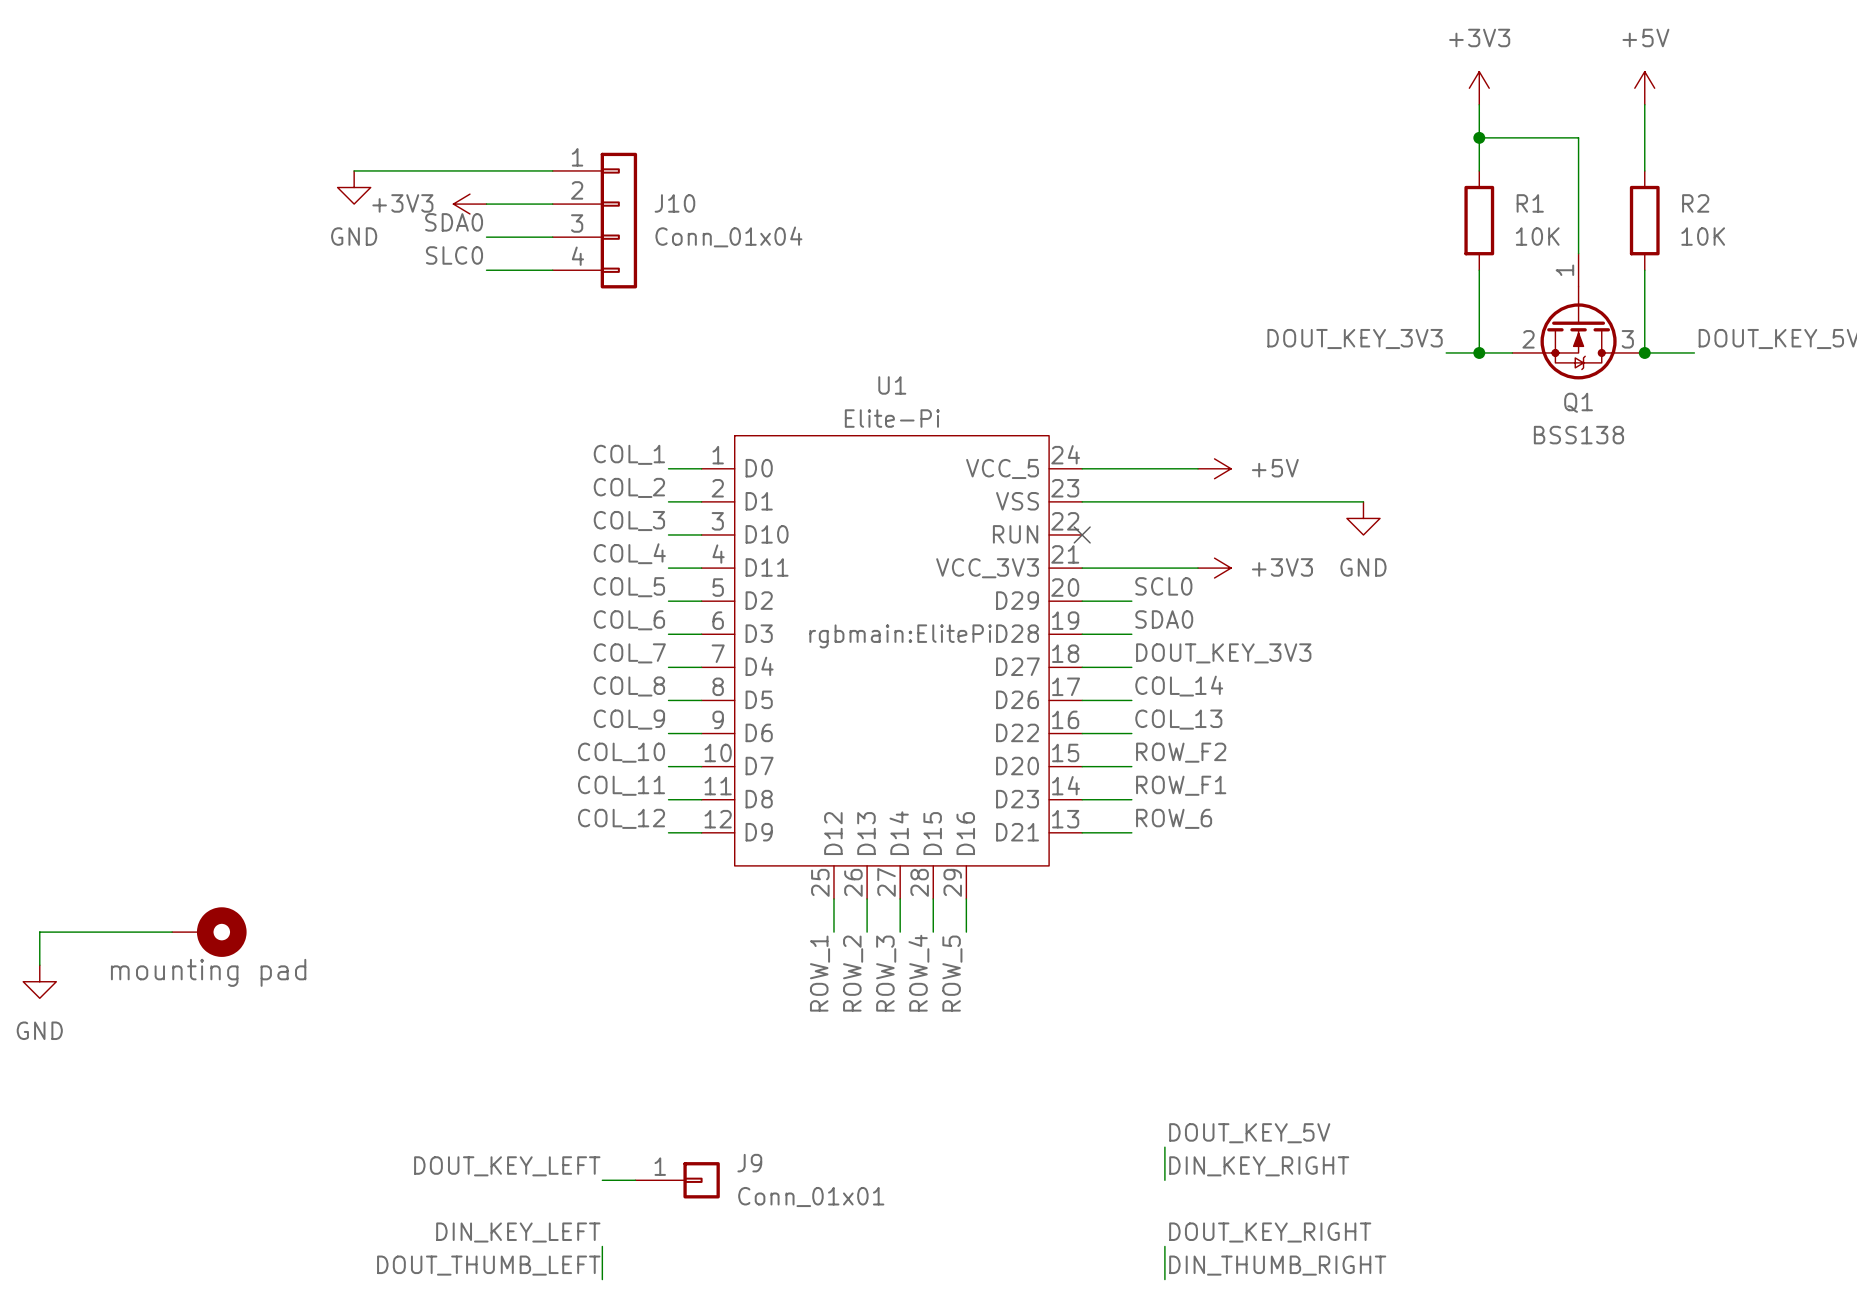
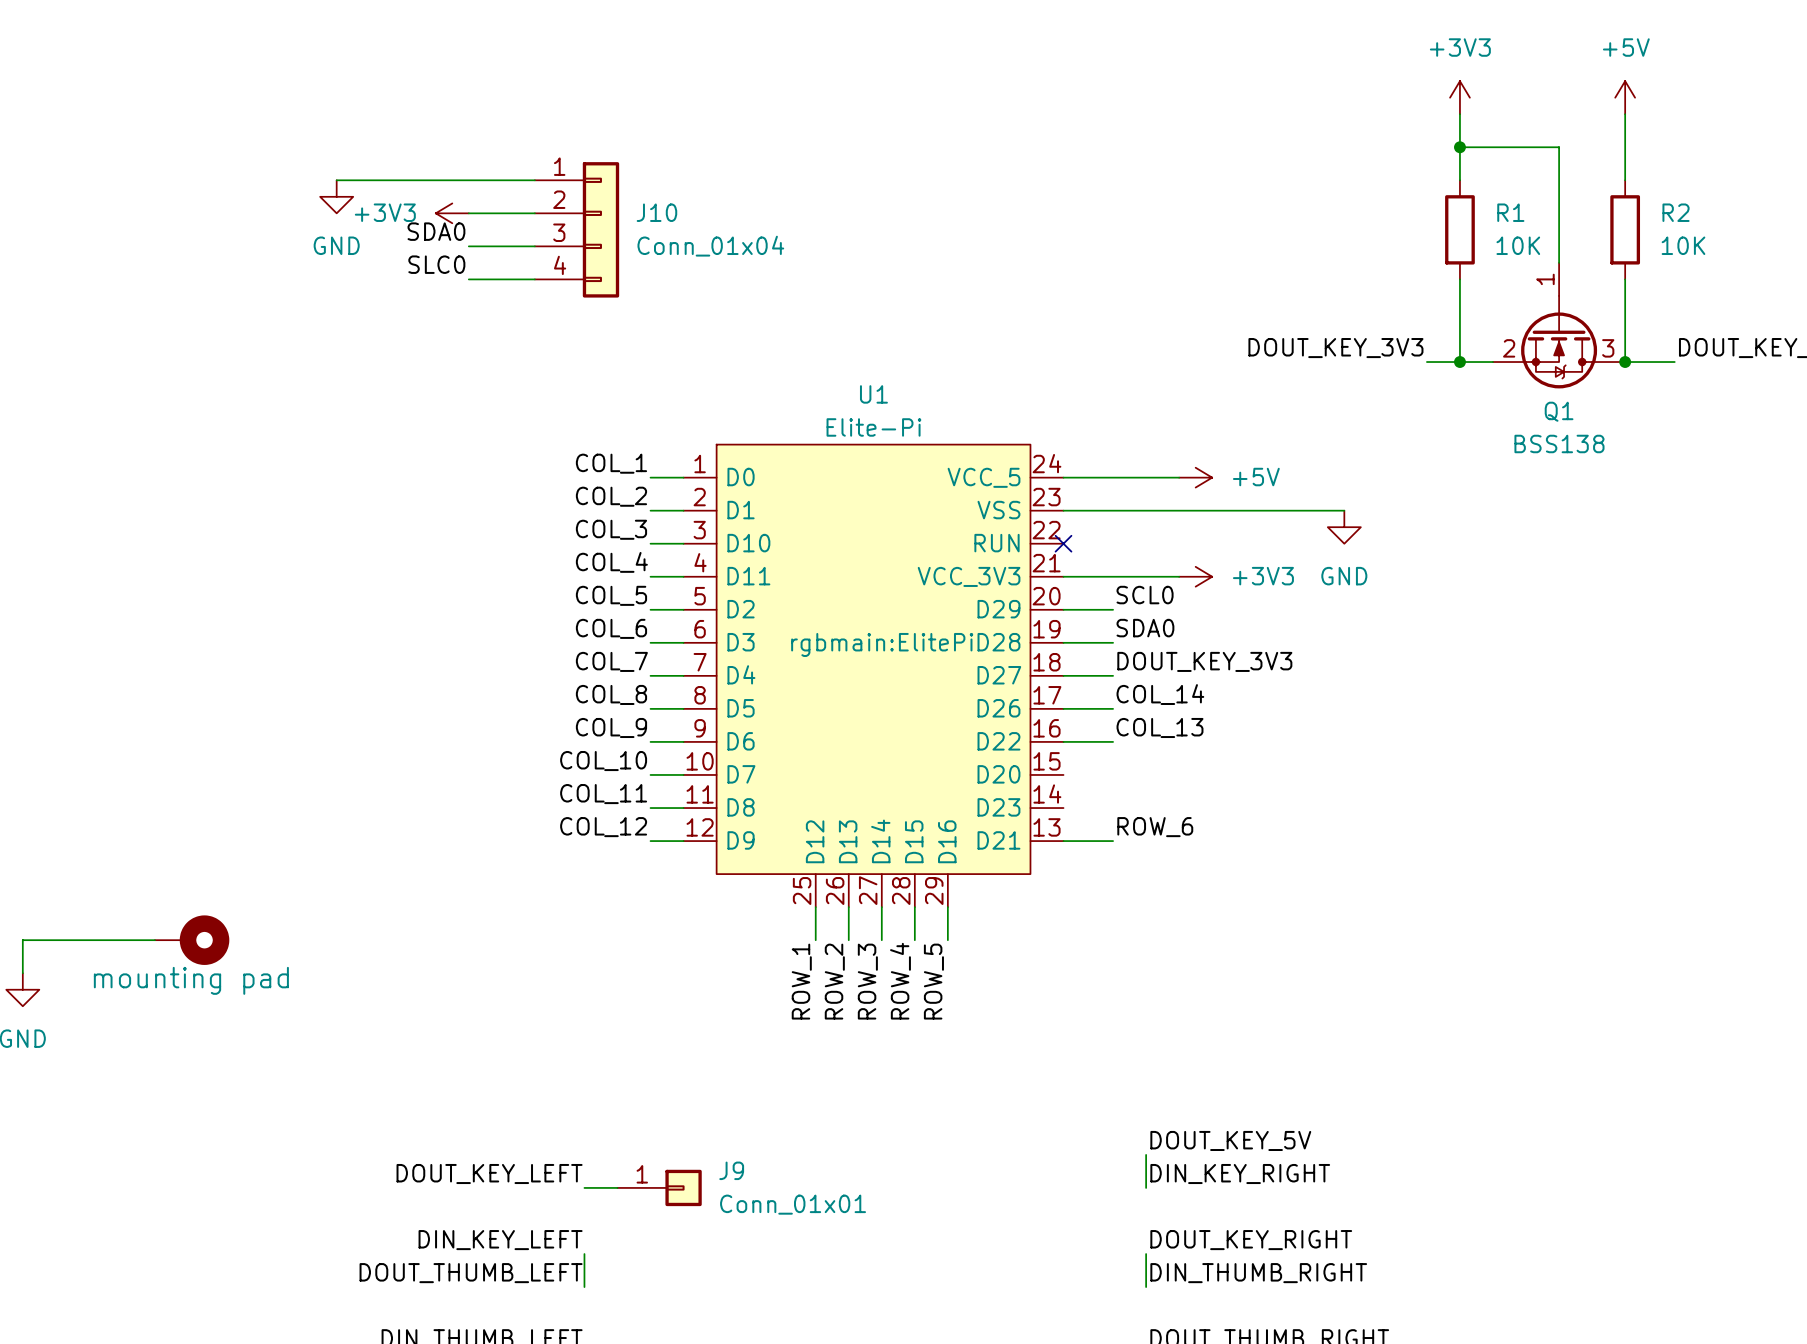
label: ROW_F2 (1181, 752) -> none
wire: (1082, 766) (1131, 766) -> none
label: ROW_F1 (1181, 785) -> none
wire: (1082, 799) (1131, 799) -> none

